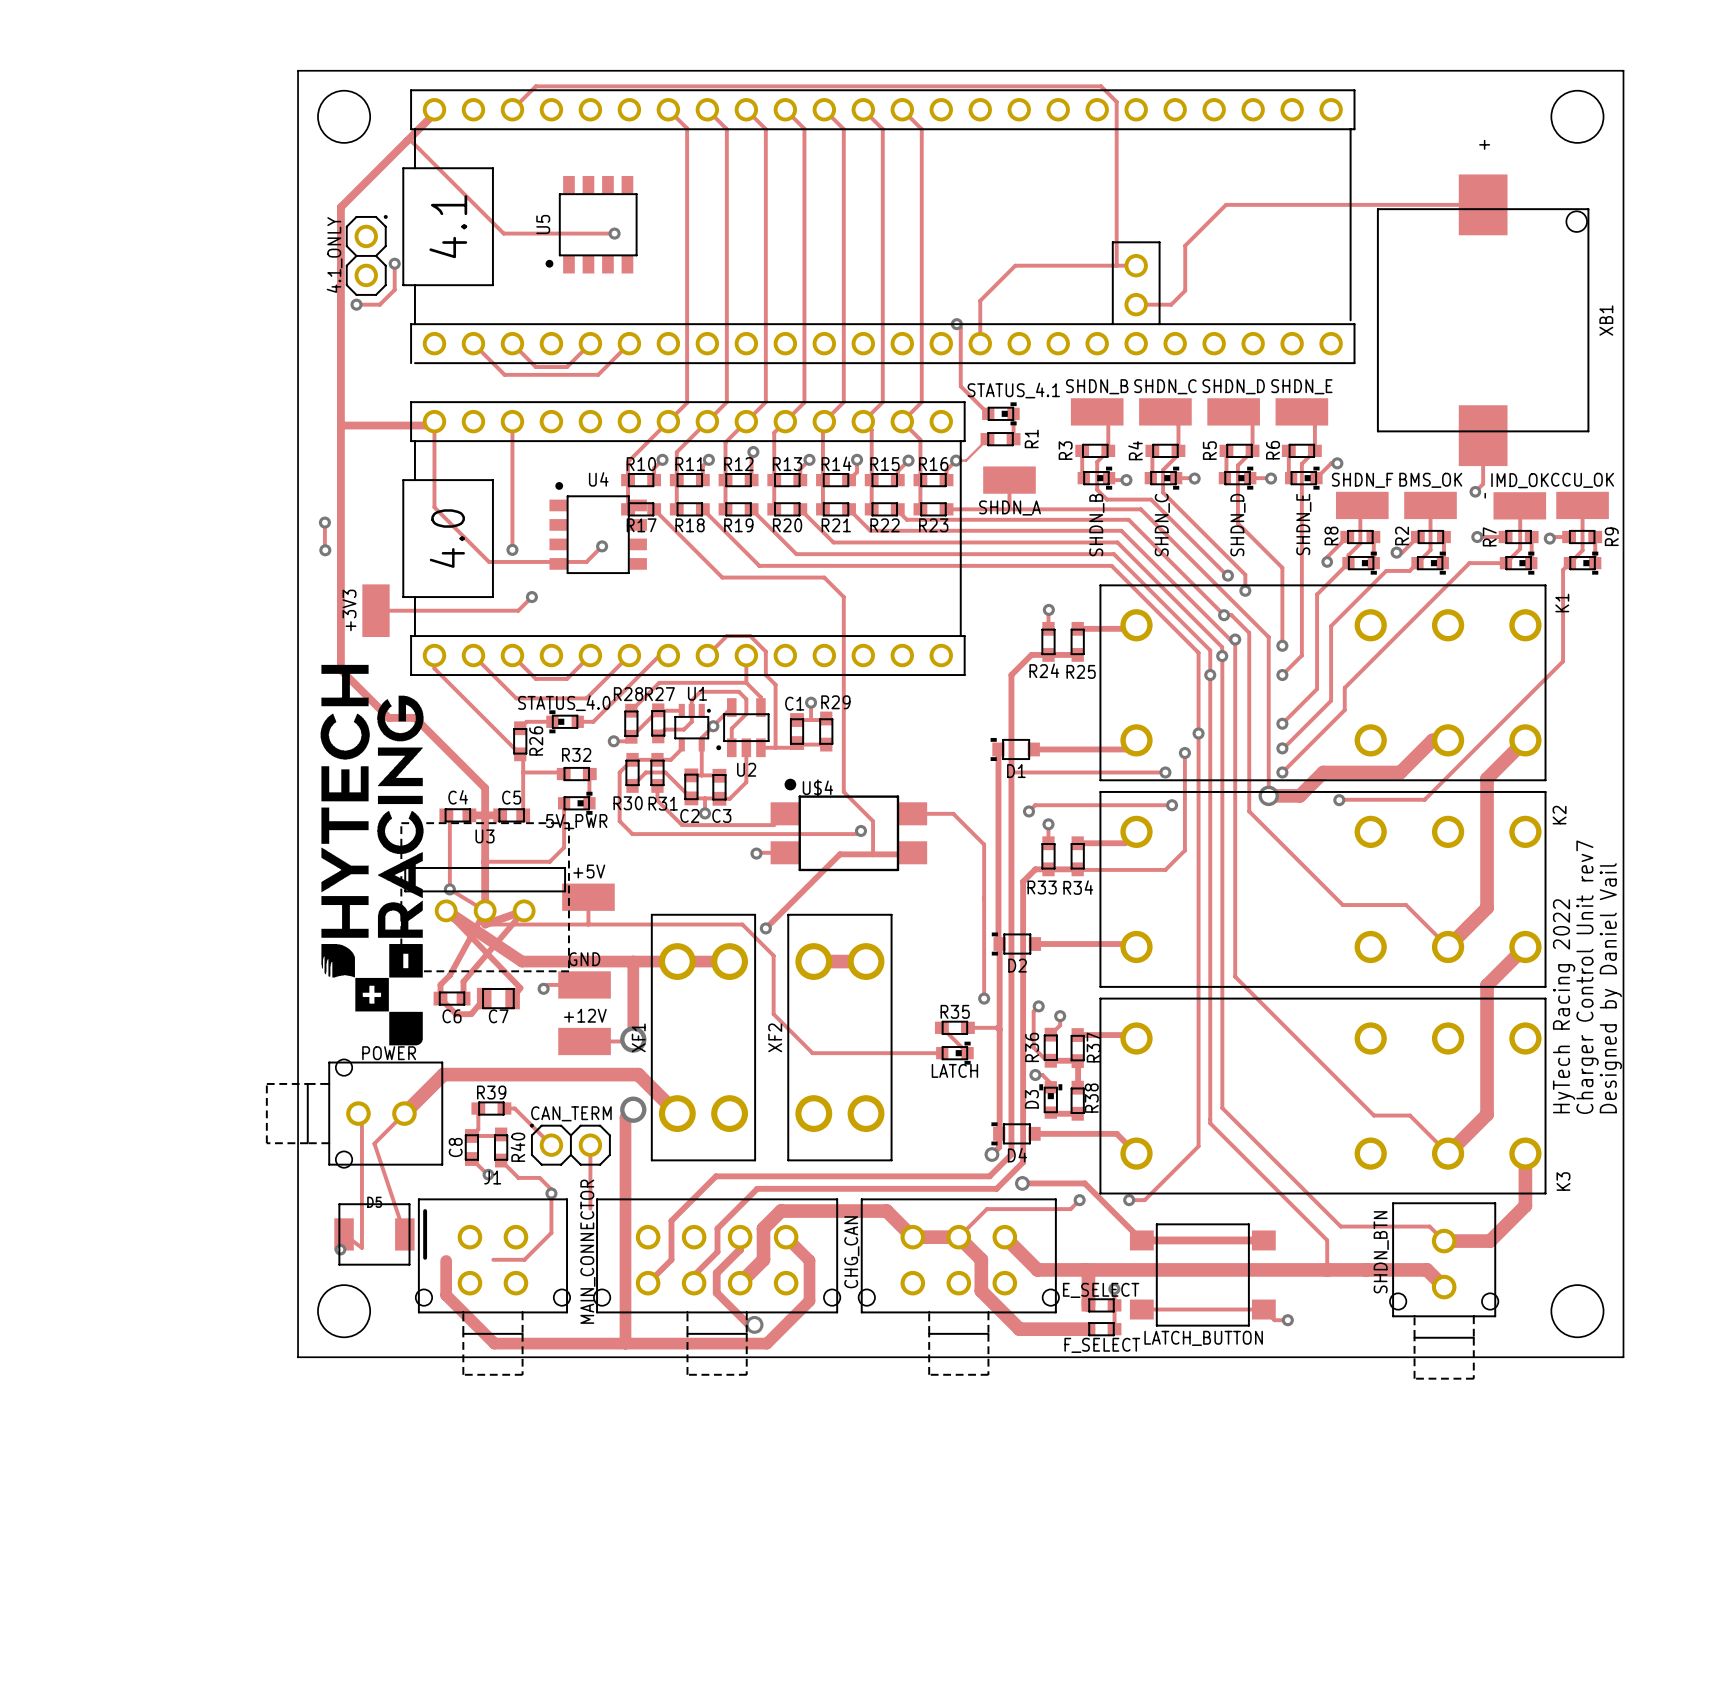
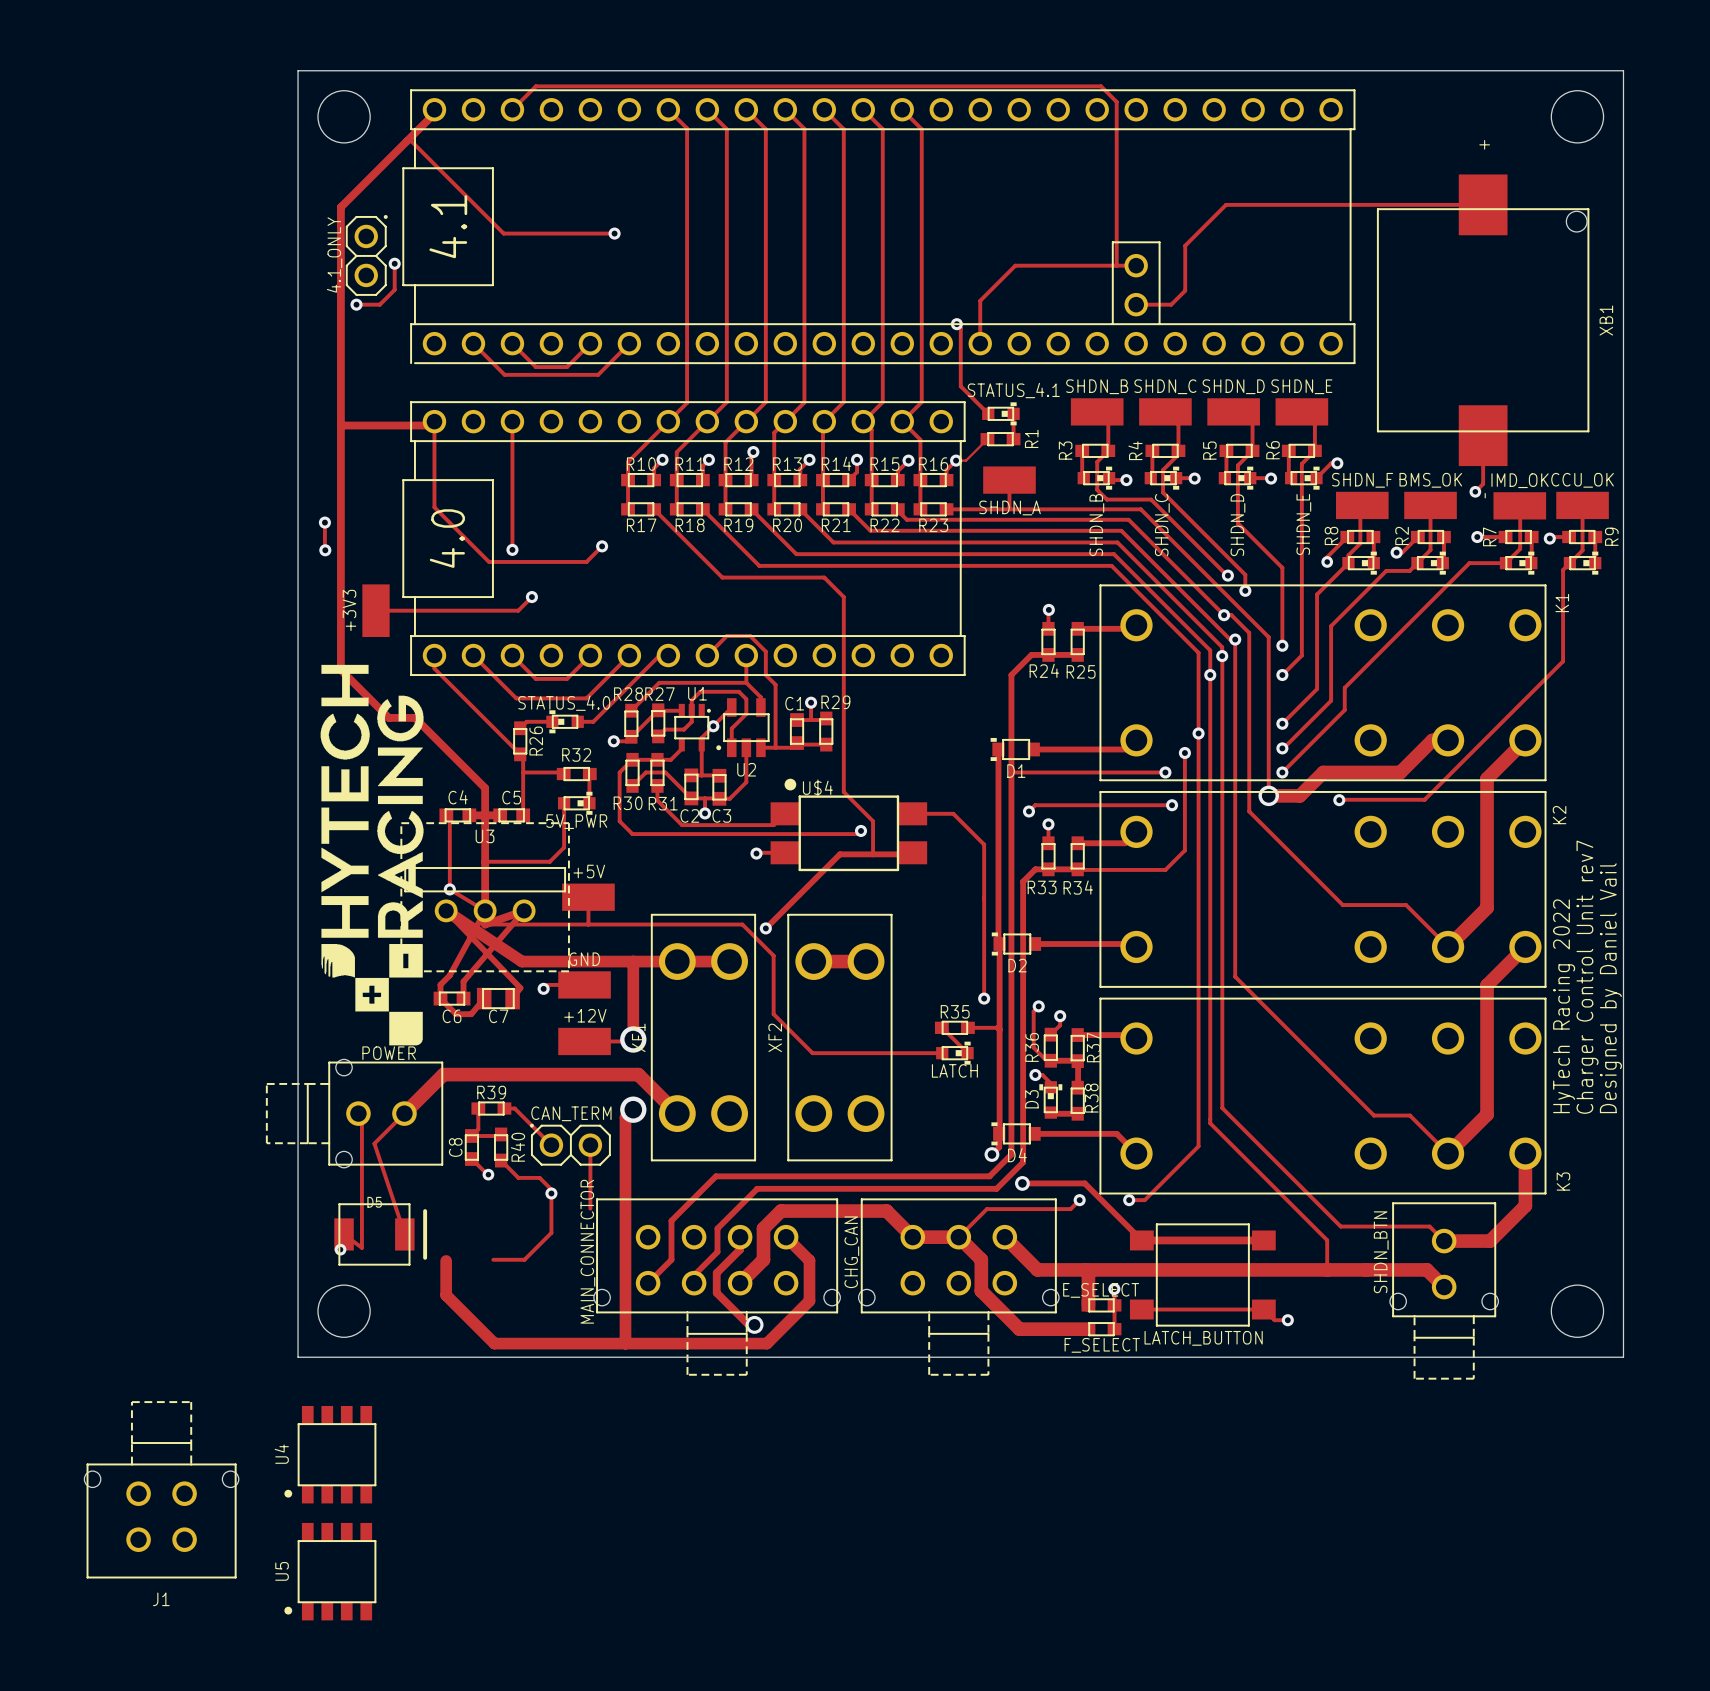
U5 position: (591, 224) -> (330, 1571)
U4 rotation: 0° (598, 528) -> 90° counterclockwise (330, 1454)
U4 position: (598, 528) -> (330, 1454)
J1 rotation: 0° (492, 1287) -> 180° (161, 1489)
J1 position: (492, 1287) -> (161, 1489)

